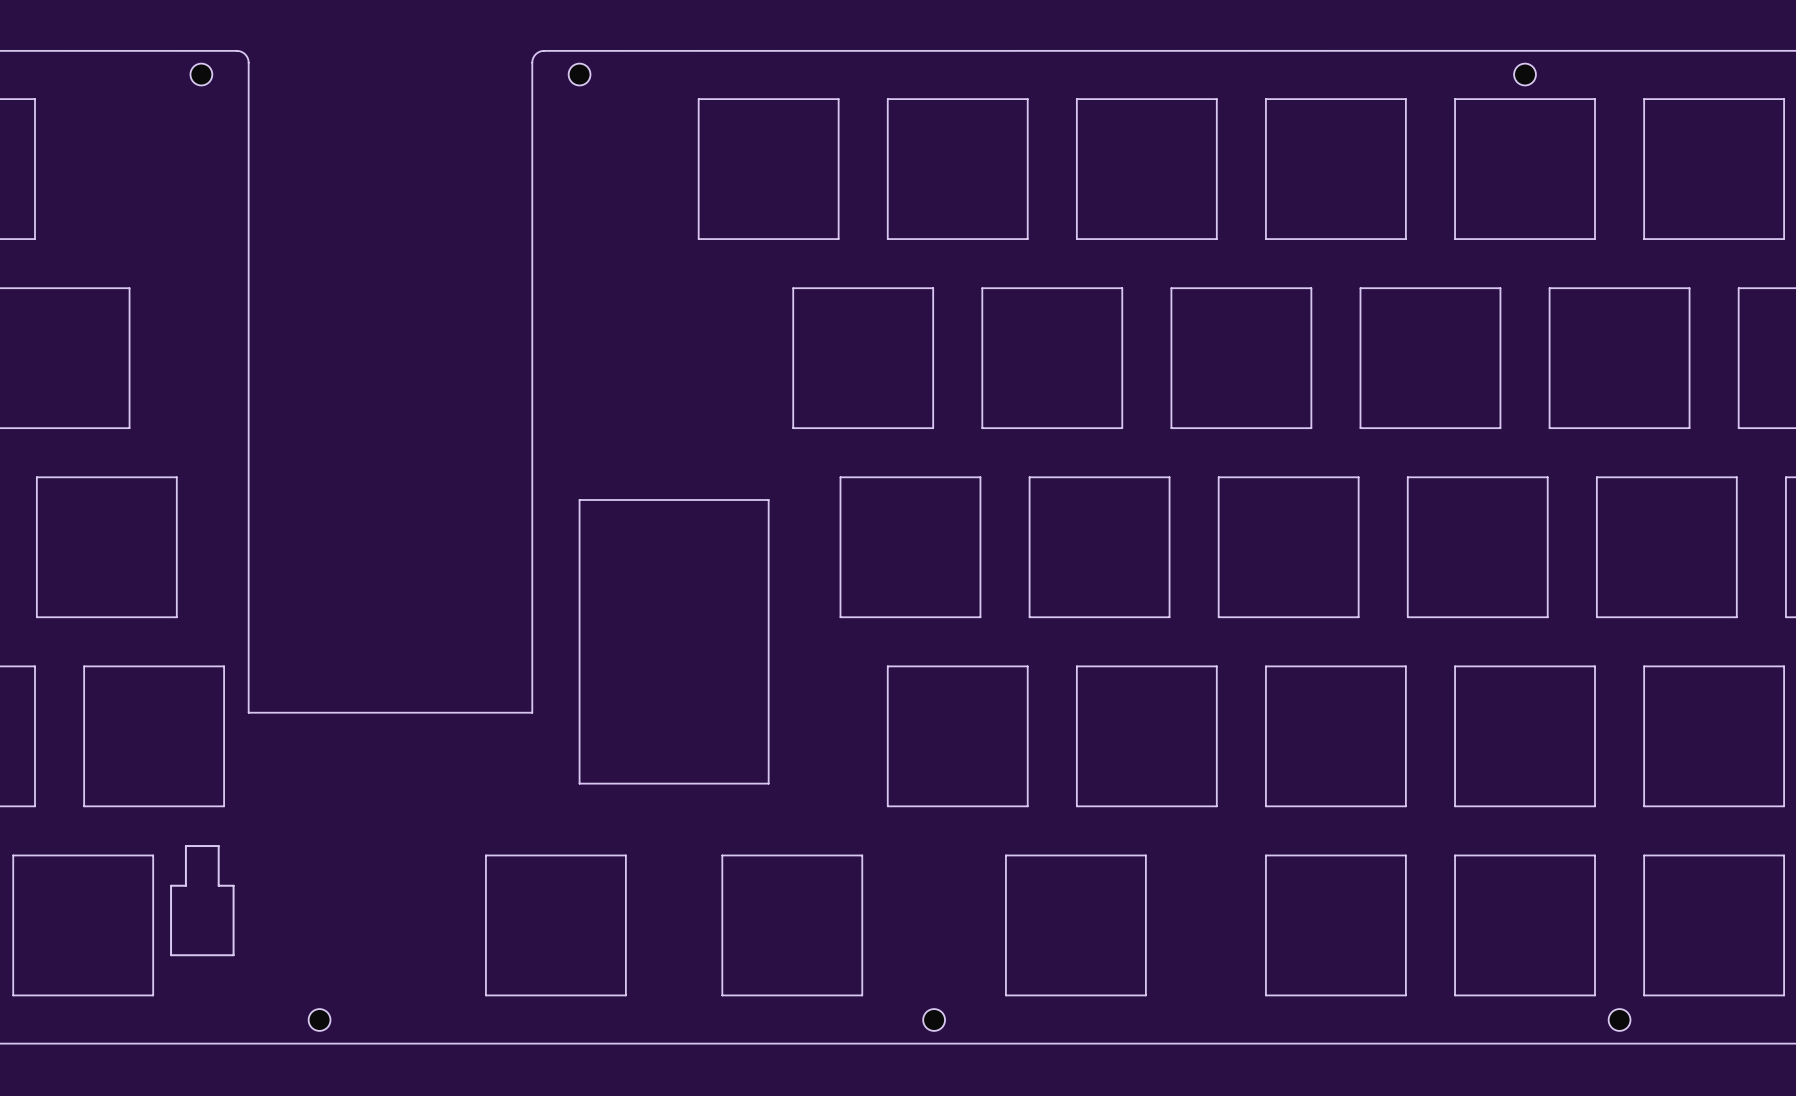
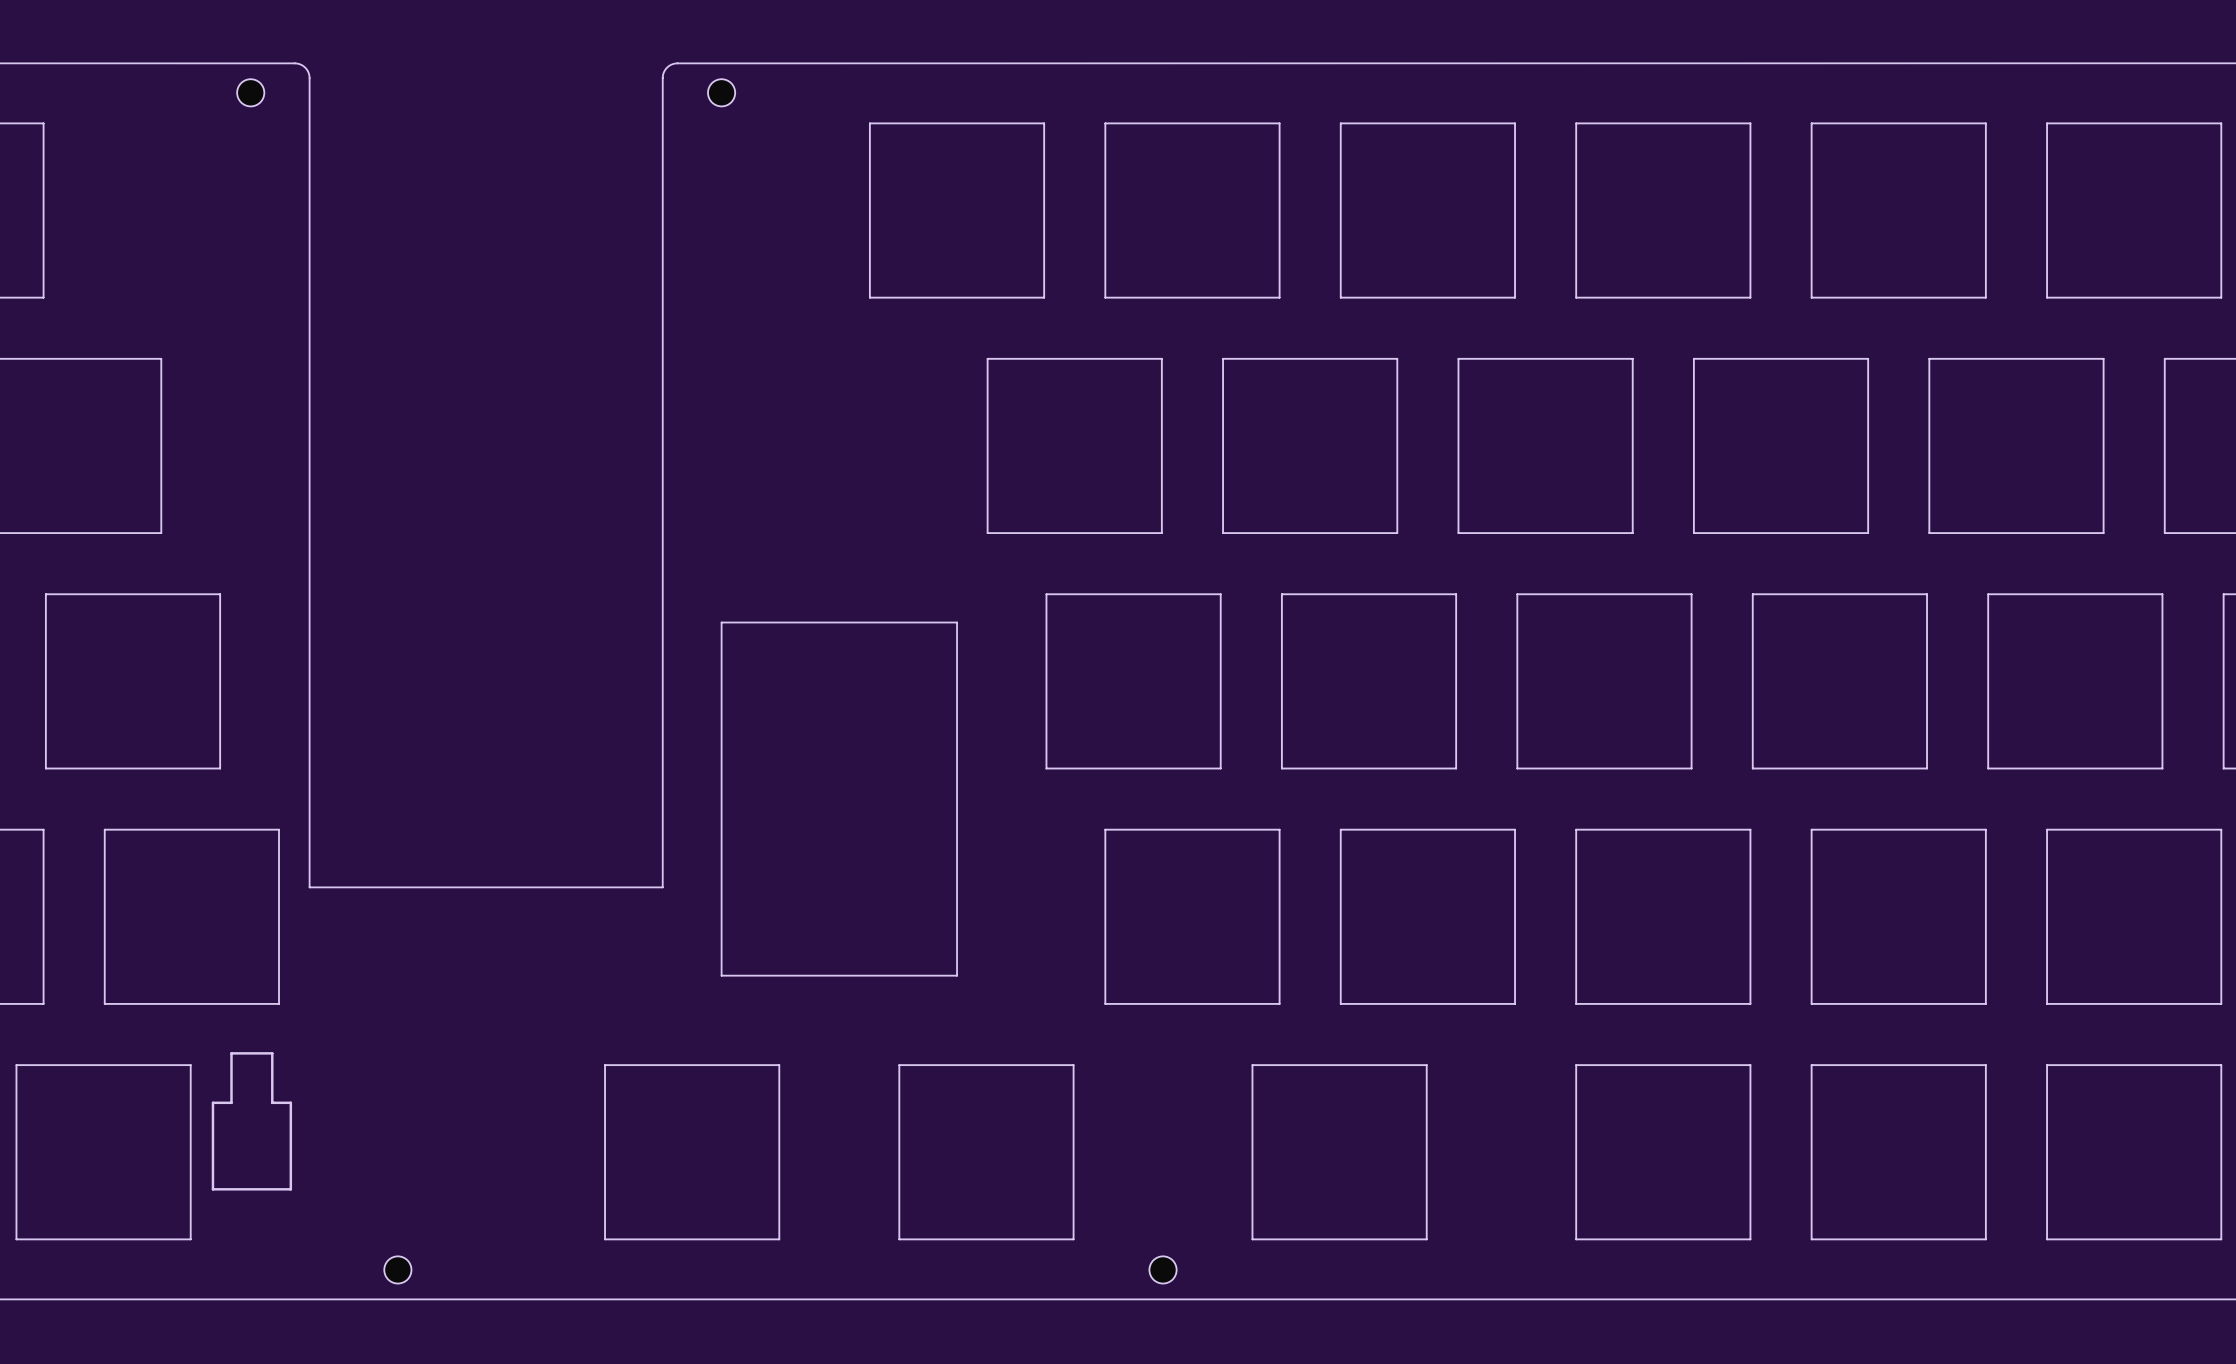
part: (1525, 74) -> none
part: (1619, 1019) -> none

